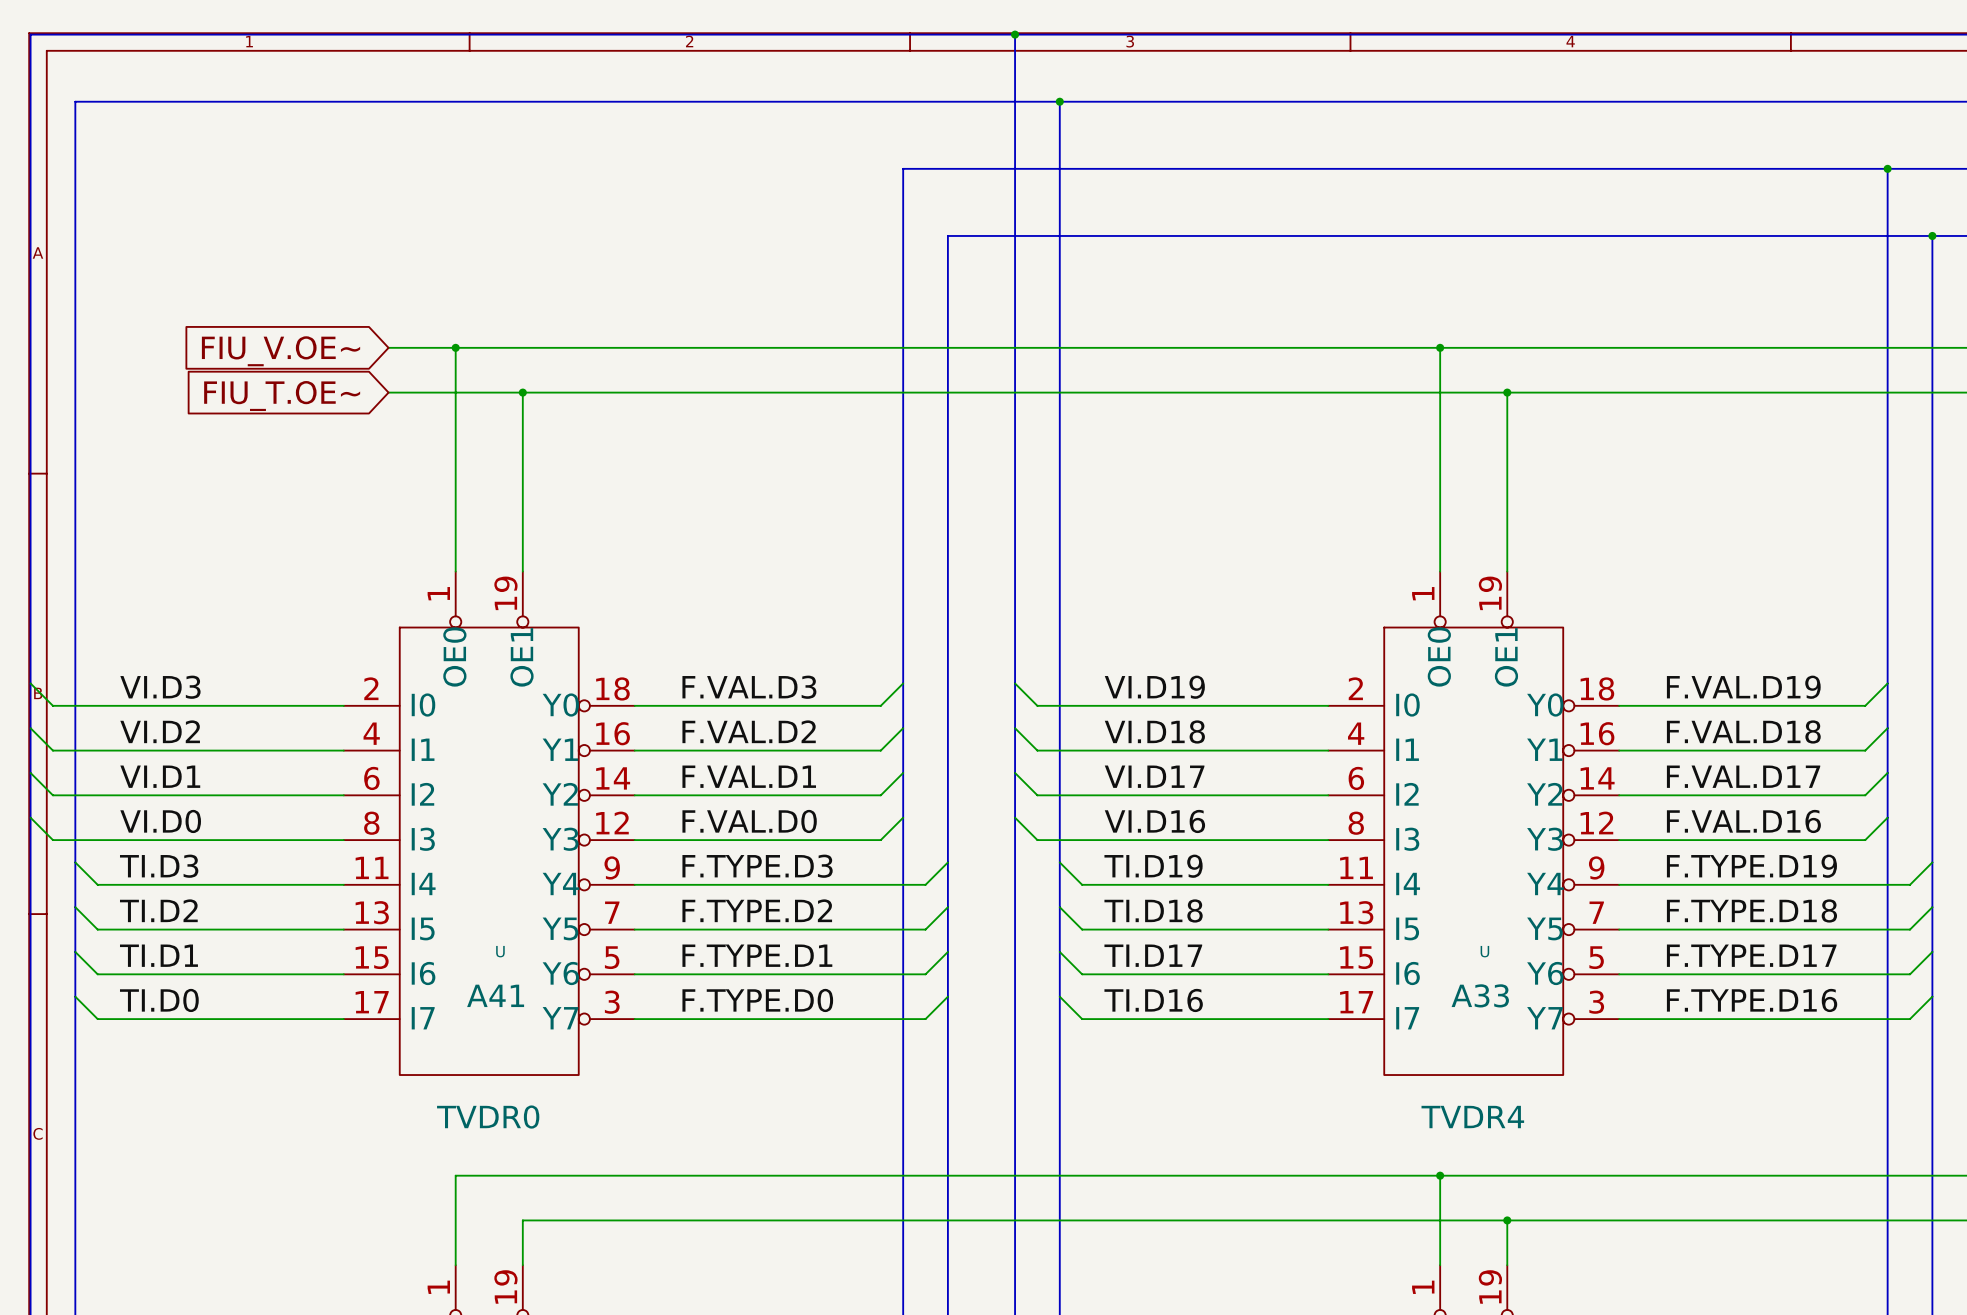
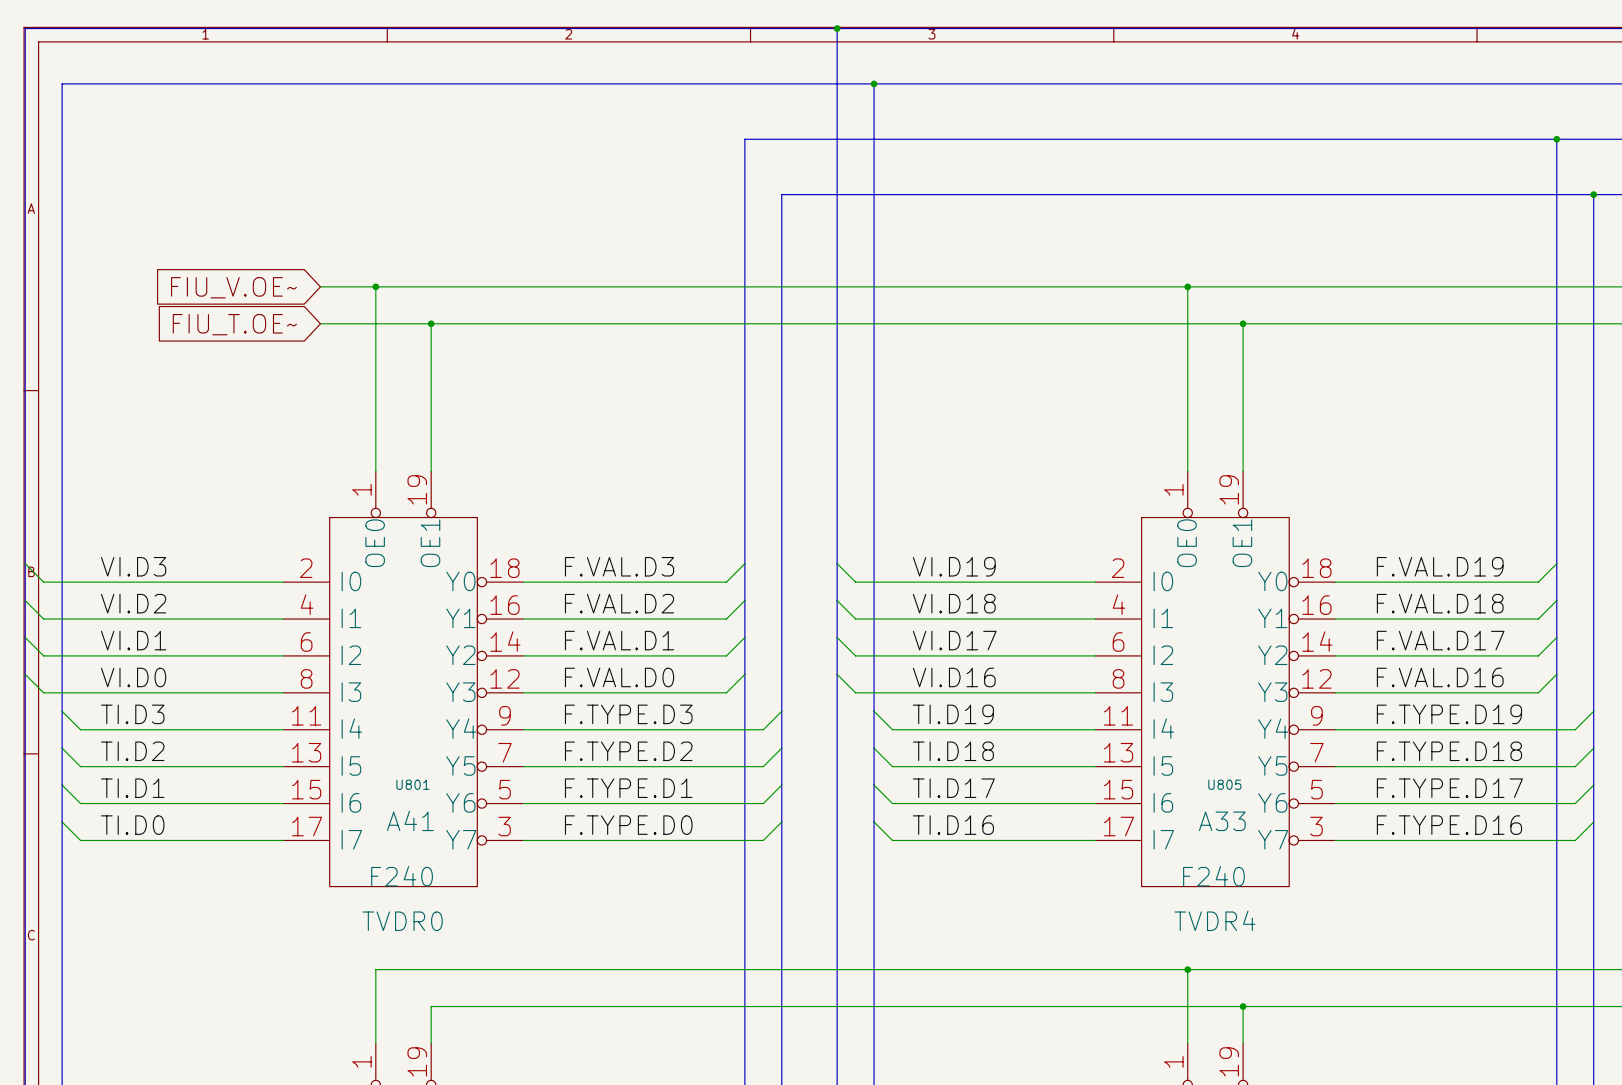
U name: U (500, 951) -> U801 (412, 784)
U name: U (1484, 951) -> U805 (1224, 784)
U value: none -> F240 (402, 876)
U value: none -> F240 (1213, 876)

